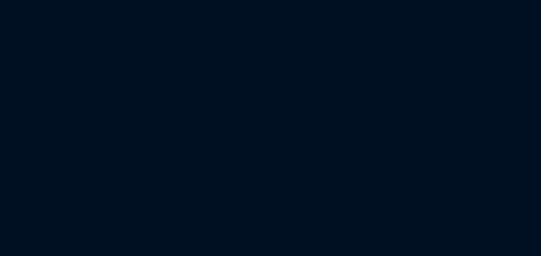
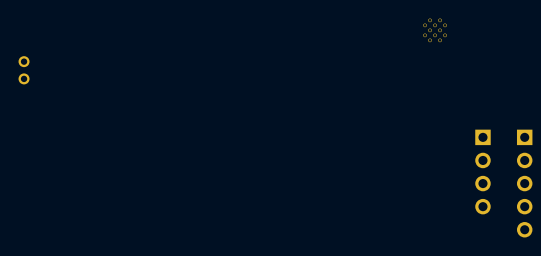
part: none -> (435, 30)
part: none -> (24, 70)
part: none -> (482, 172)
part: none -> (524, 183)

